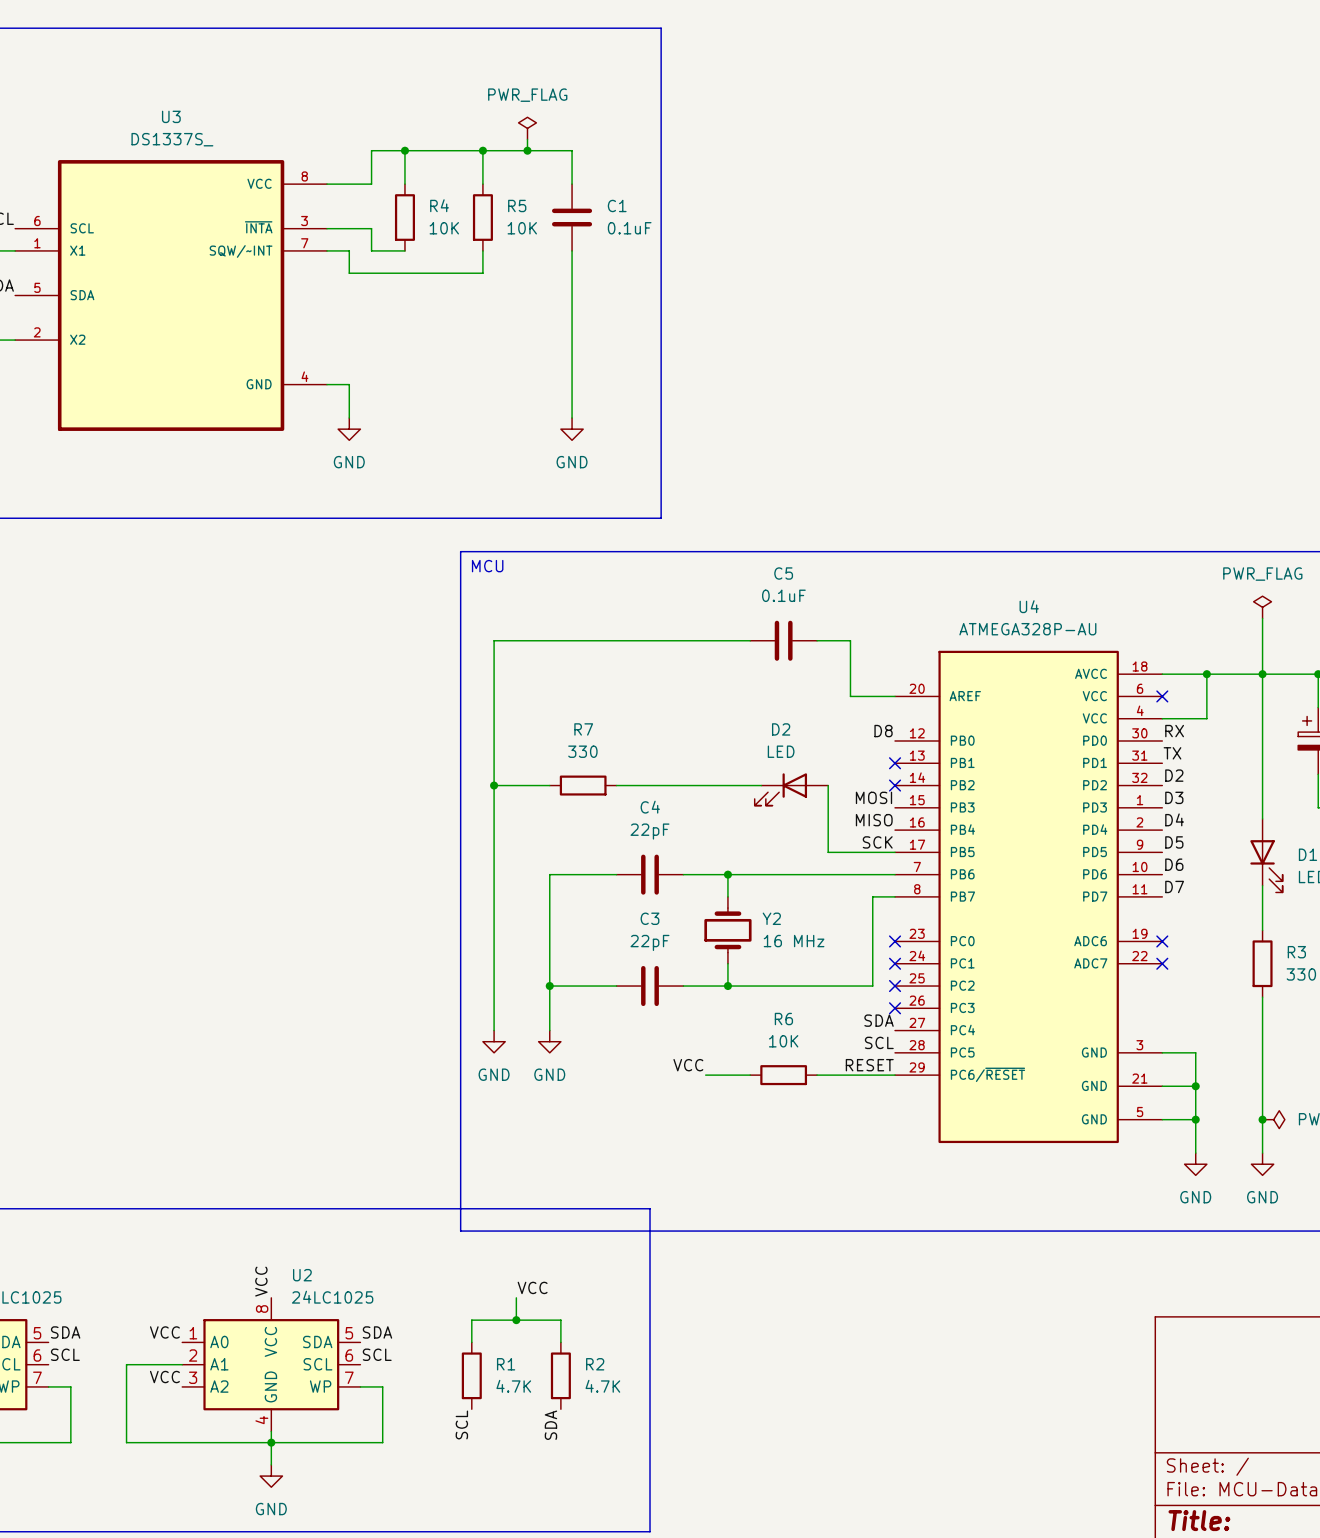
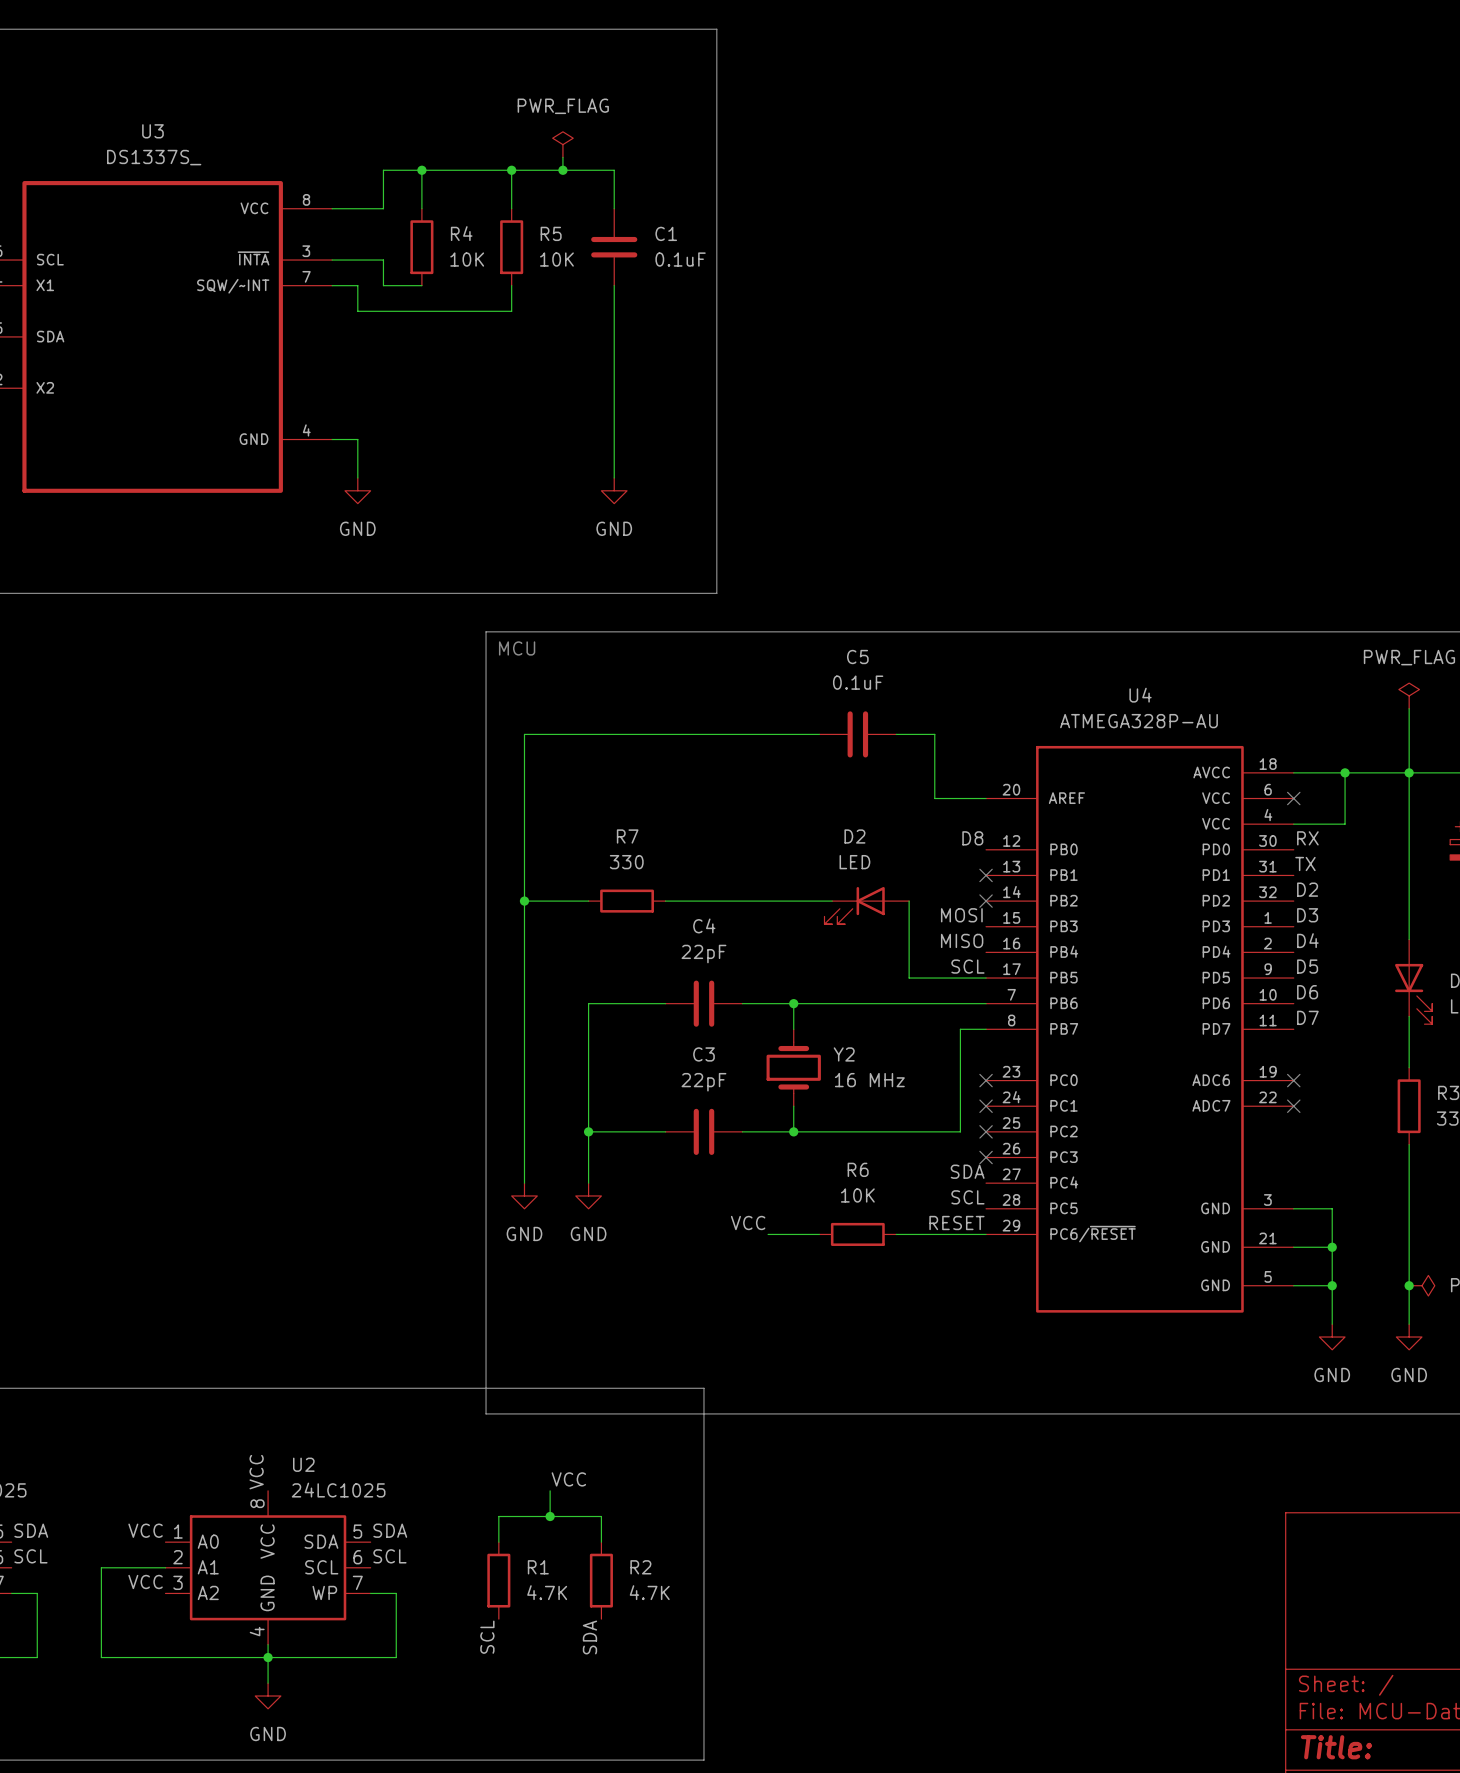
label: SCK (877, 842) -> SCL (967, 966)

